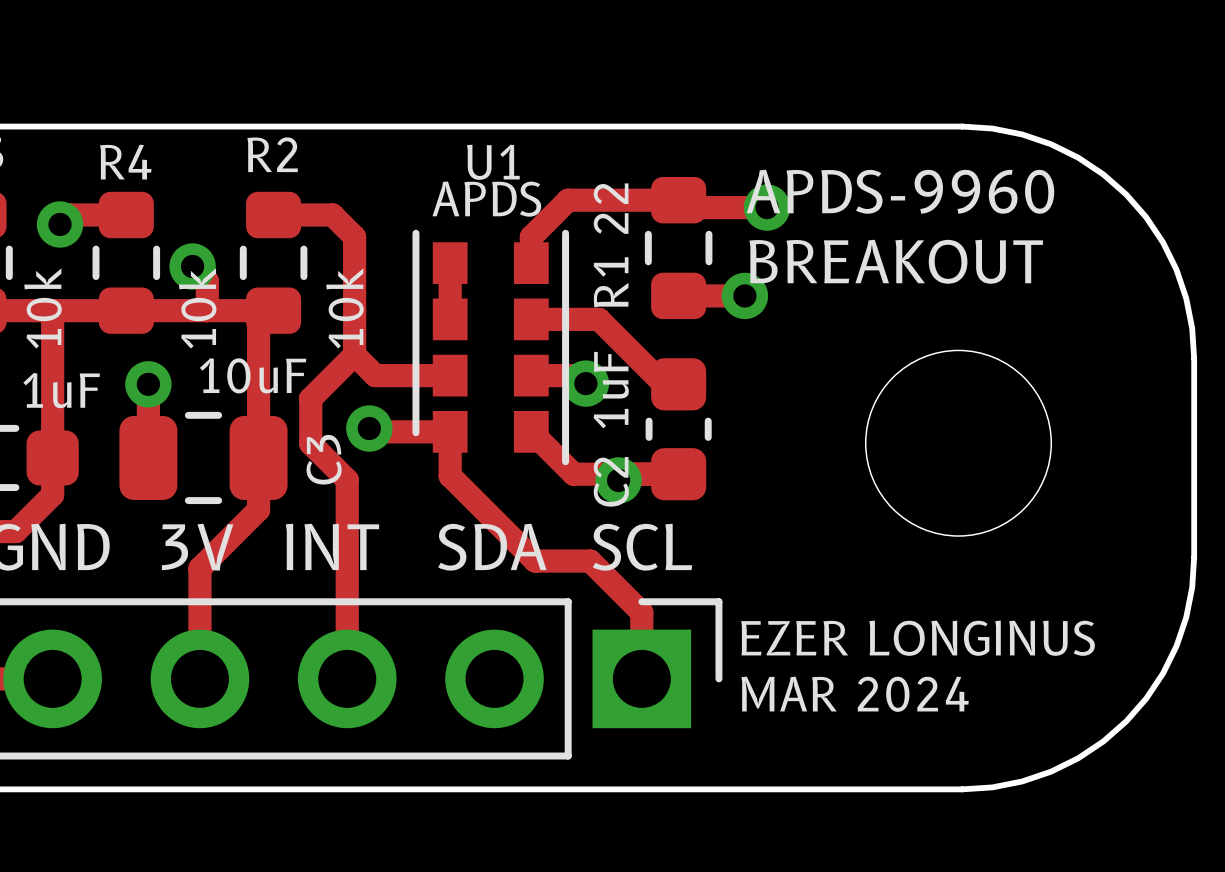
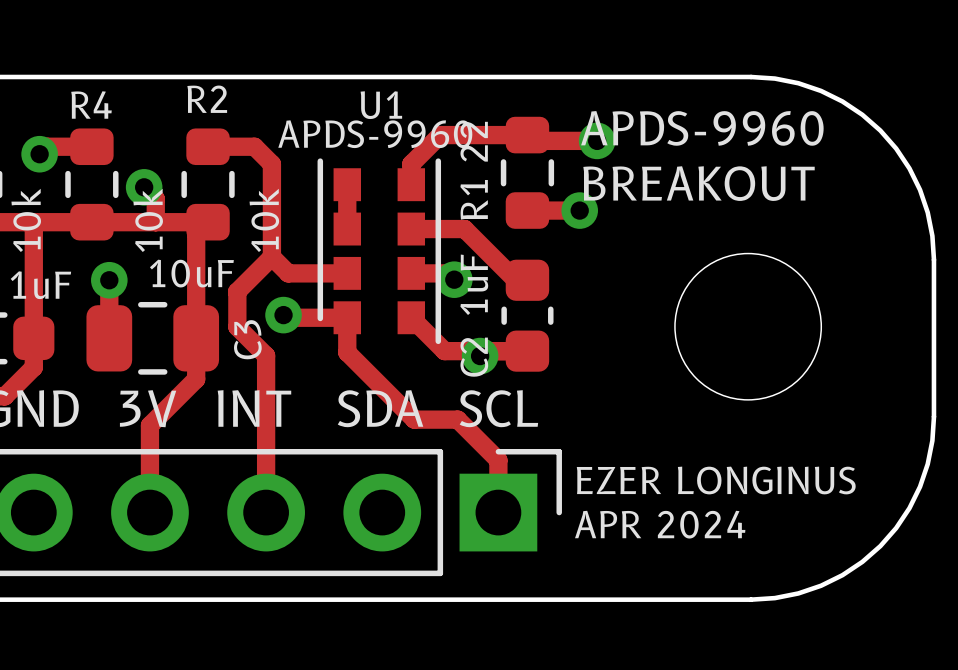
U1 value: APDS (486, 199) -> APDS-9960 (375, 134)
text: MAR 2024 (855, 694) -> APR 2024 (660, 524)

